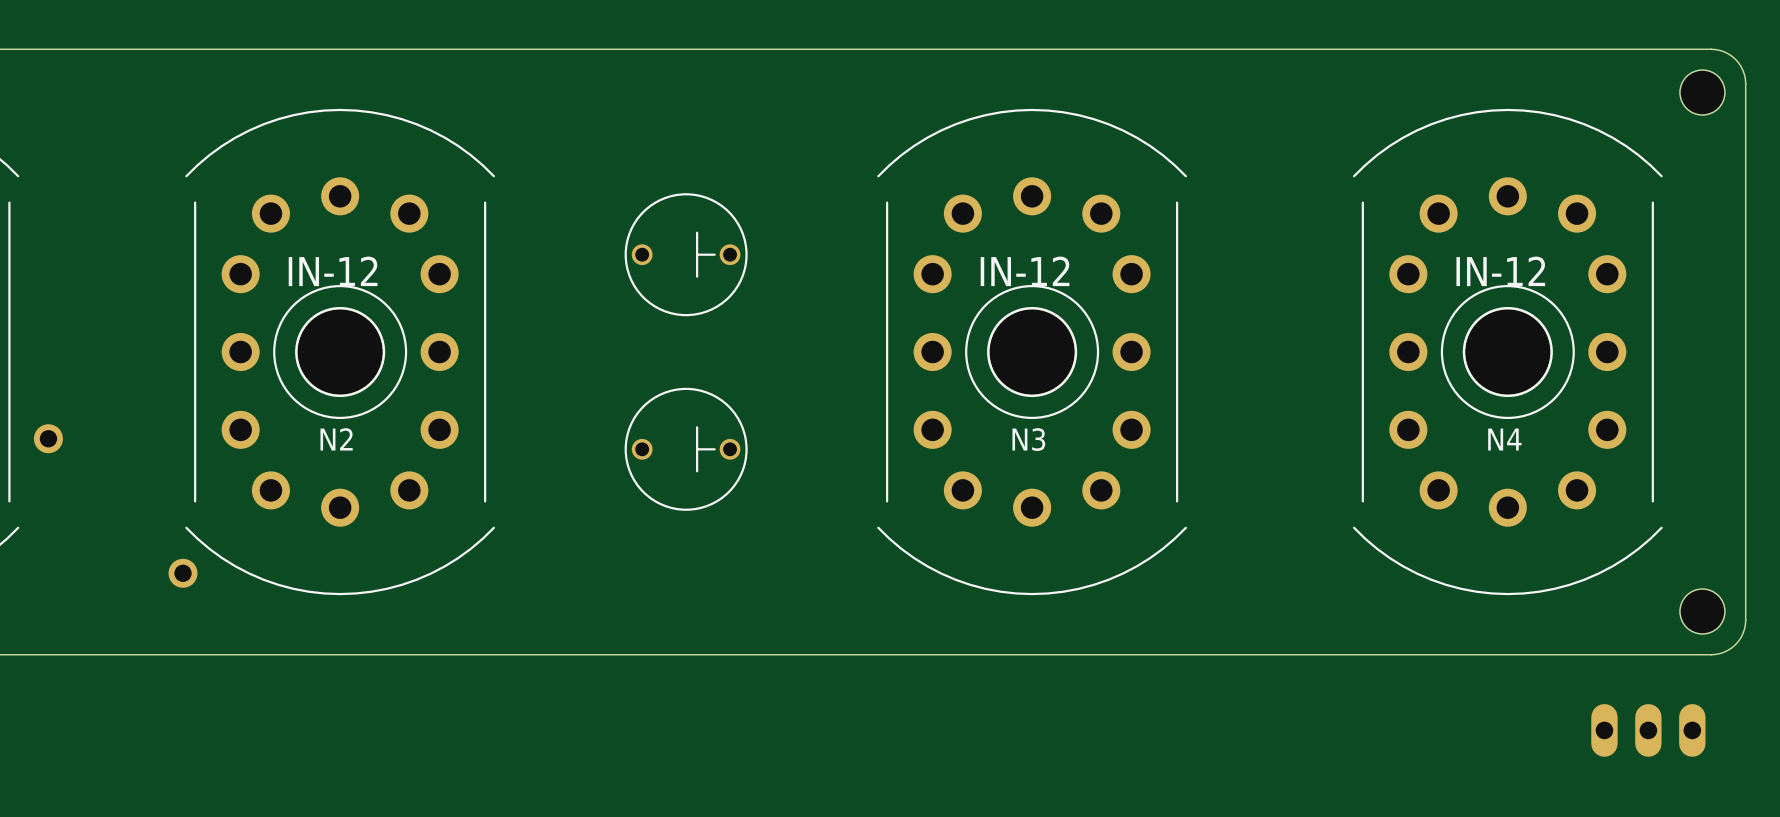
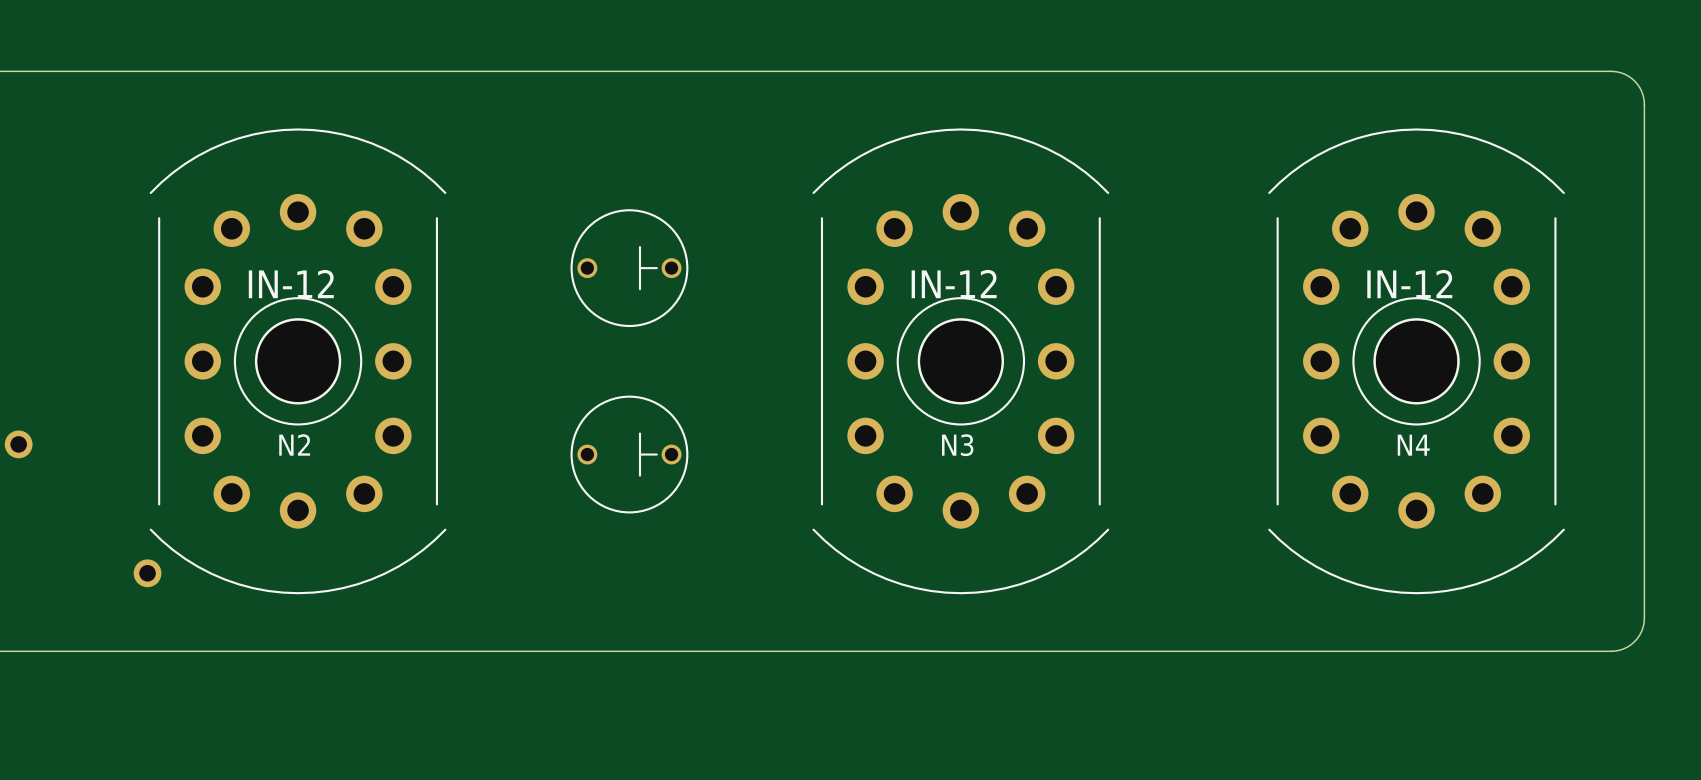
hole: (1702, 92) -> none
hole: (1702, 611) -> none
part: (1648, 730) -> none

